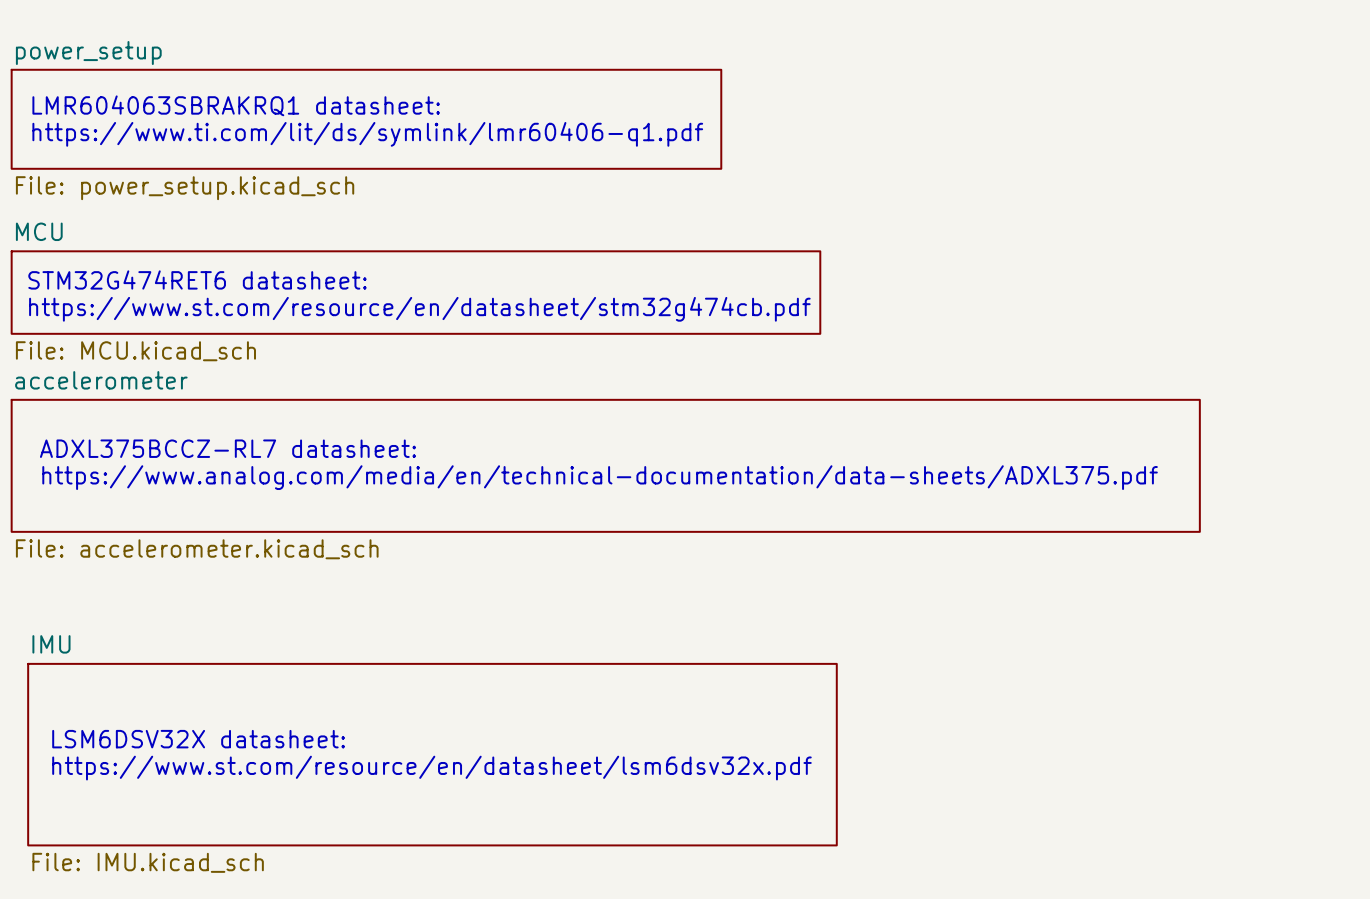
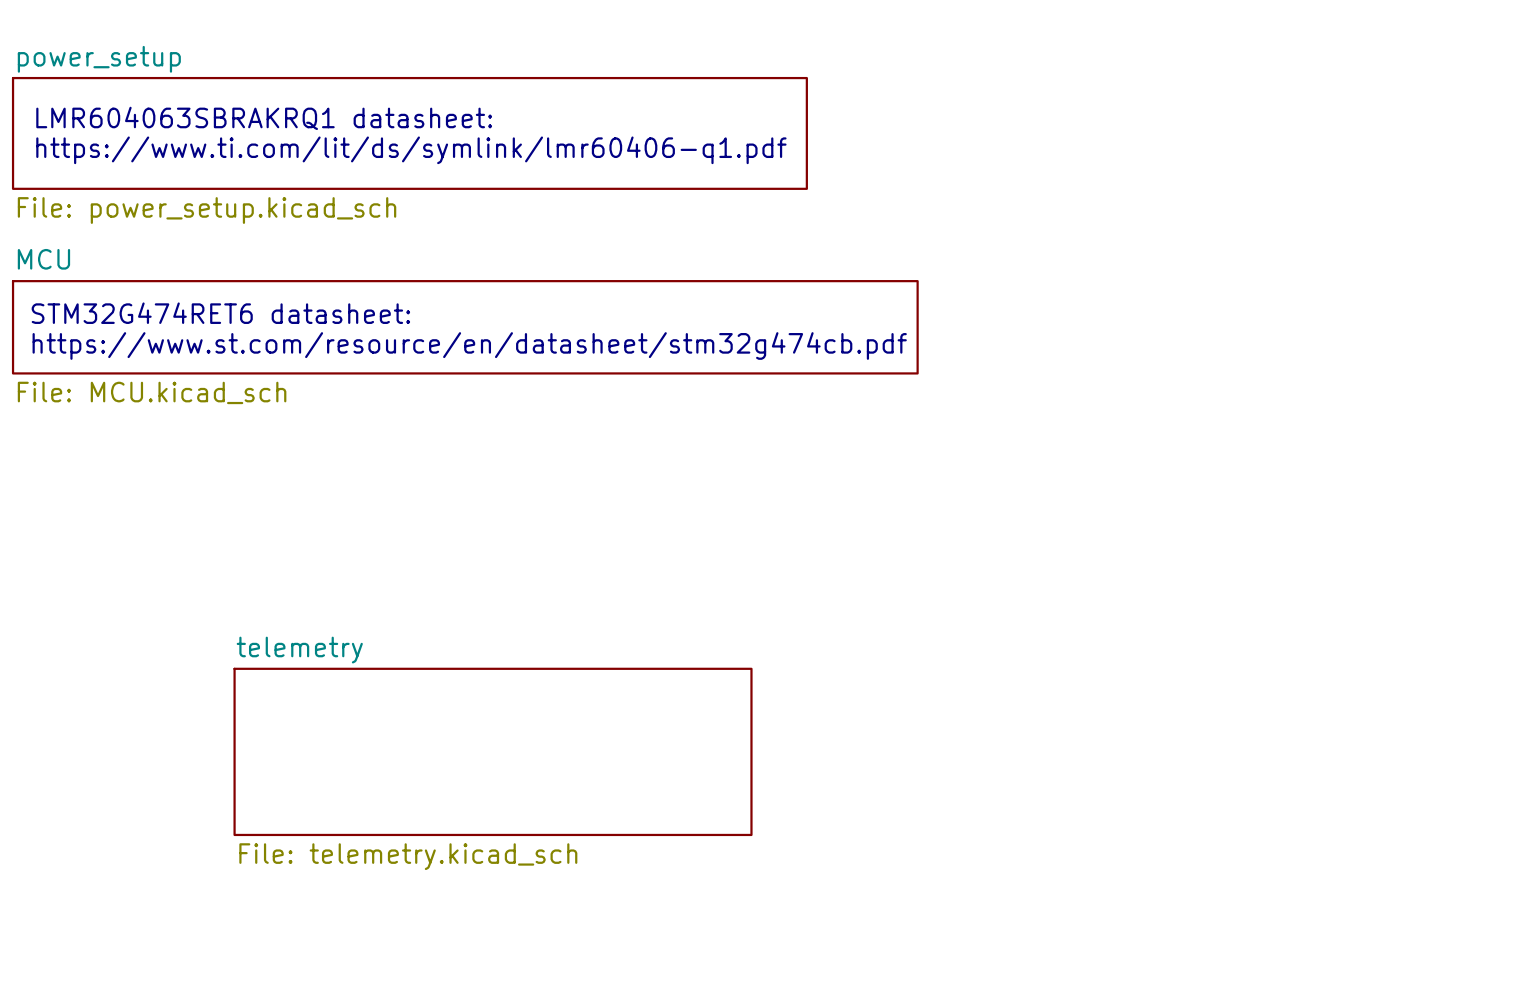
text: ADXL375BCCZ-RL7 datasheet: (227, 448) -> none
sheet accelerometer: File: accelerometer.kicad_sch (605, 465) -> none
text: https://www.analog.com/media/en/technical-documentation/data-sheets/ADXL375.pdf (600, 477) -> none
sheet telemetry: none -> File: telemetry.kicad_sch (493, 751)
text: LSM6DSV32X datasheet: (198, 739) -> none
sheet IMU: File: IMU.kicad_sch (432, 754) -> none
text: https://www.st.com/resource/en/datasheet/lsm6dsv32x.pdf (431, 768) -> none

